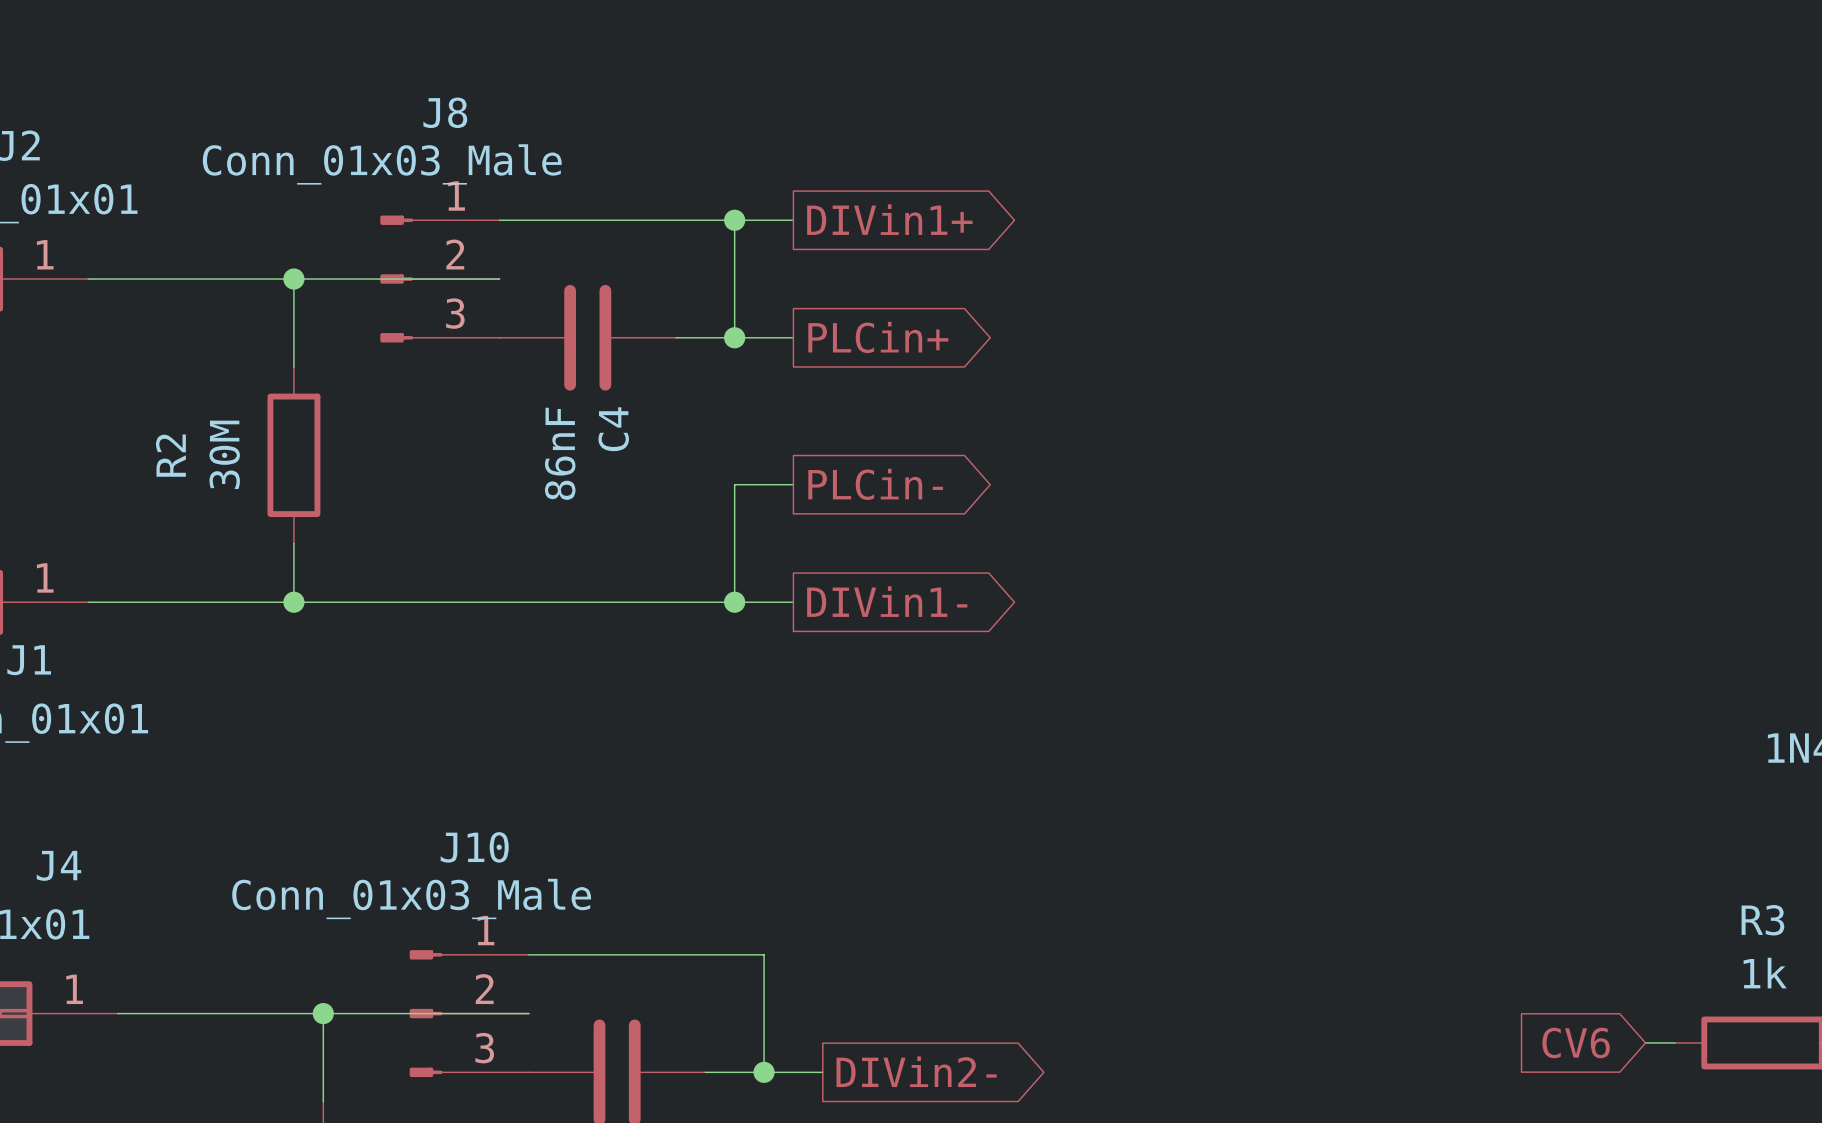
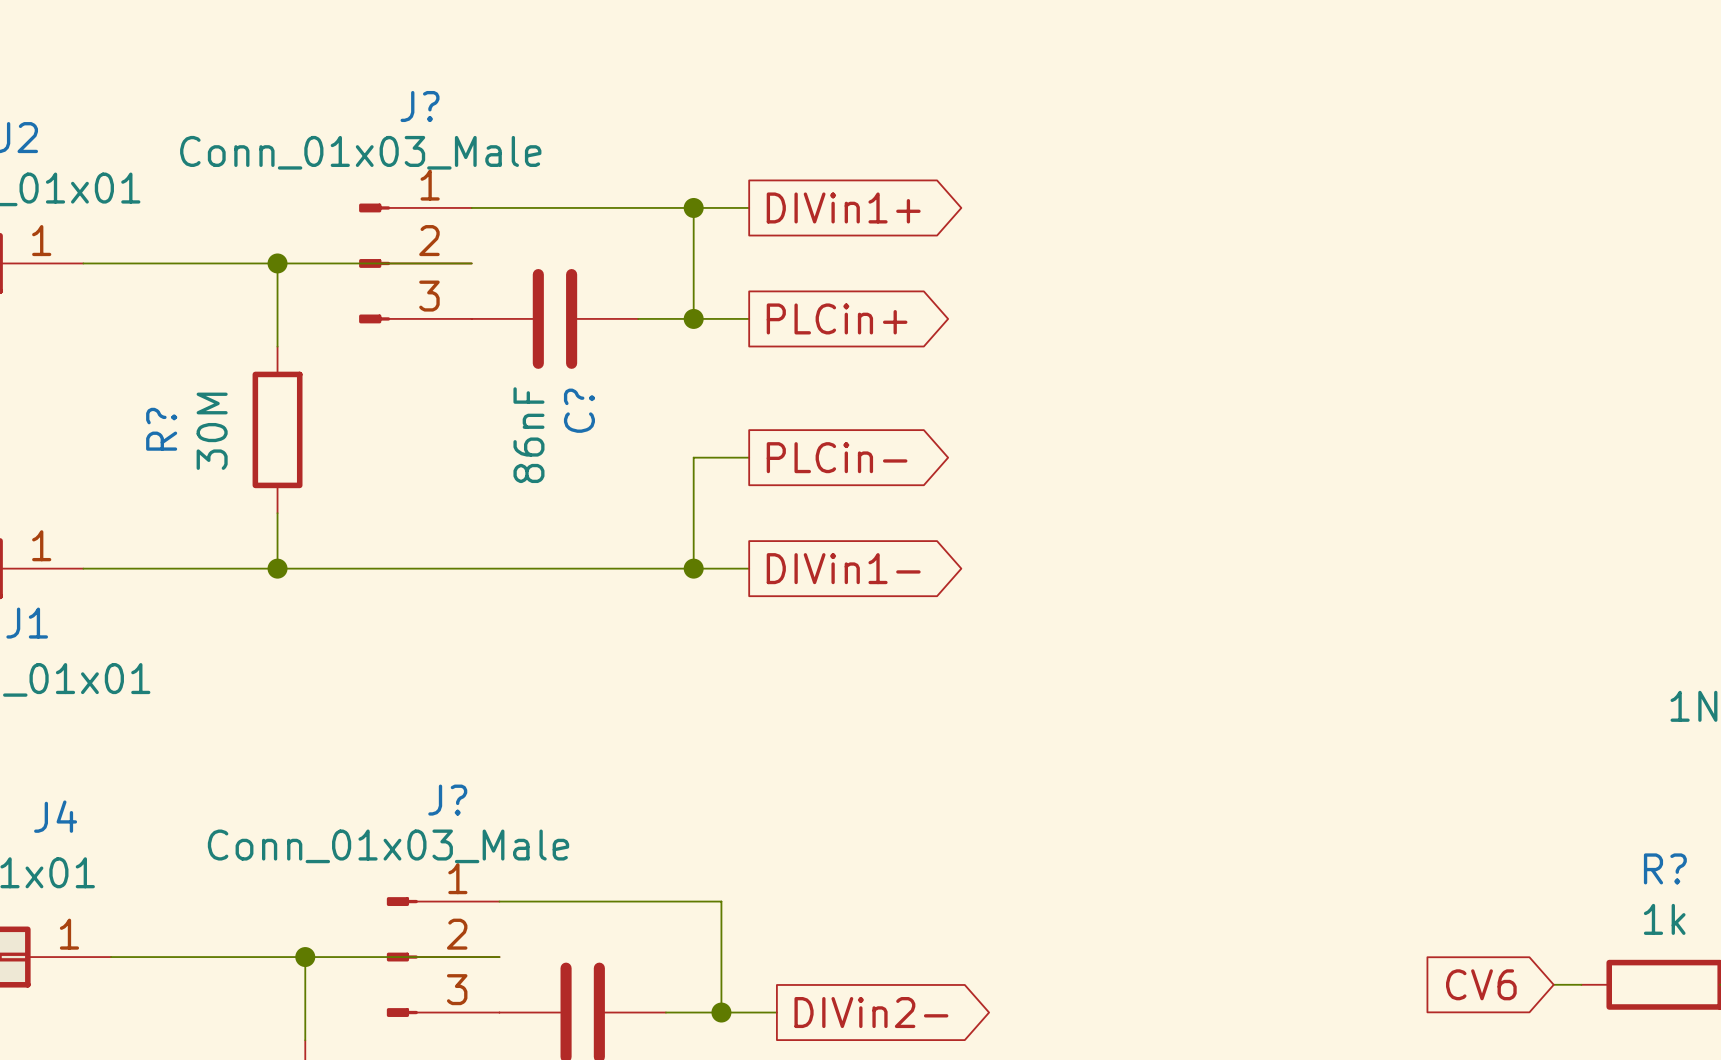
J8 name: J8 (445, 112) -> J? (420, 106)
C4 name: C4 (613, 429) -> C? (579, 410)
R2 name: R2 (170, 455) -> R? (161, 429)
J10 name: J10 (474, 847) -> J? (447, 800)
R3 name: R3 (1762, 920) -> R? (1665, 868)

